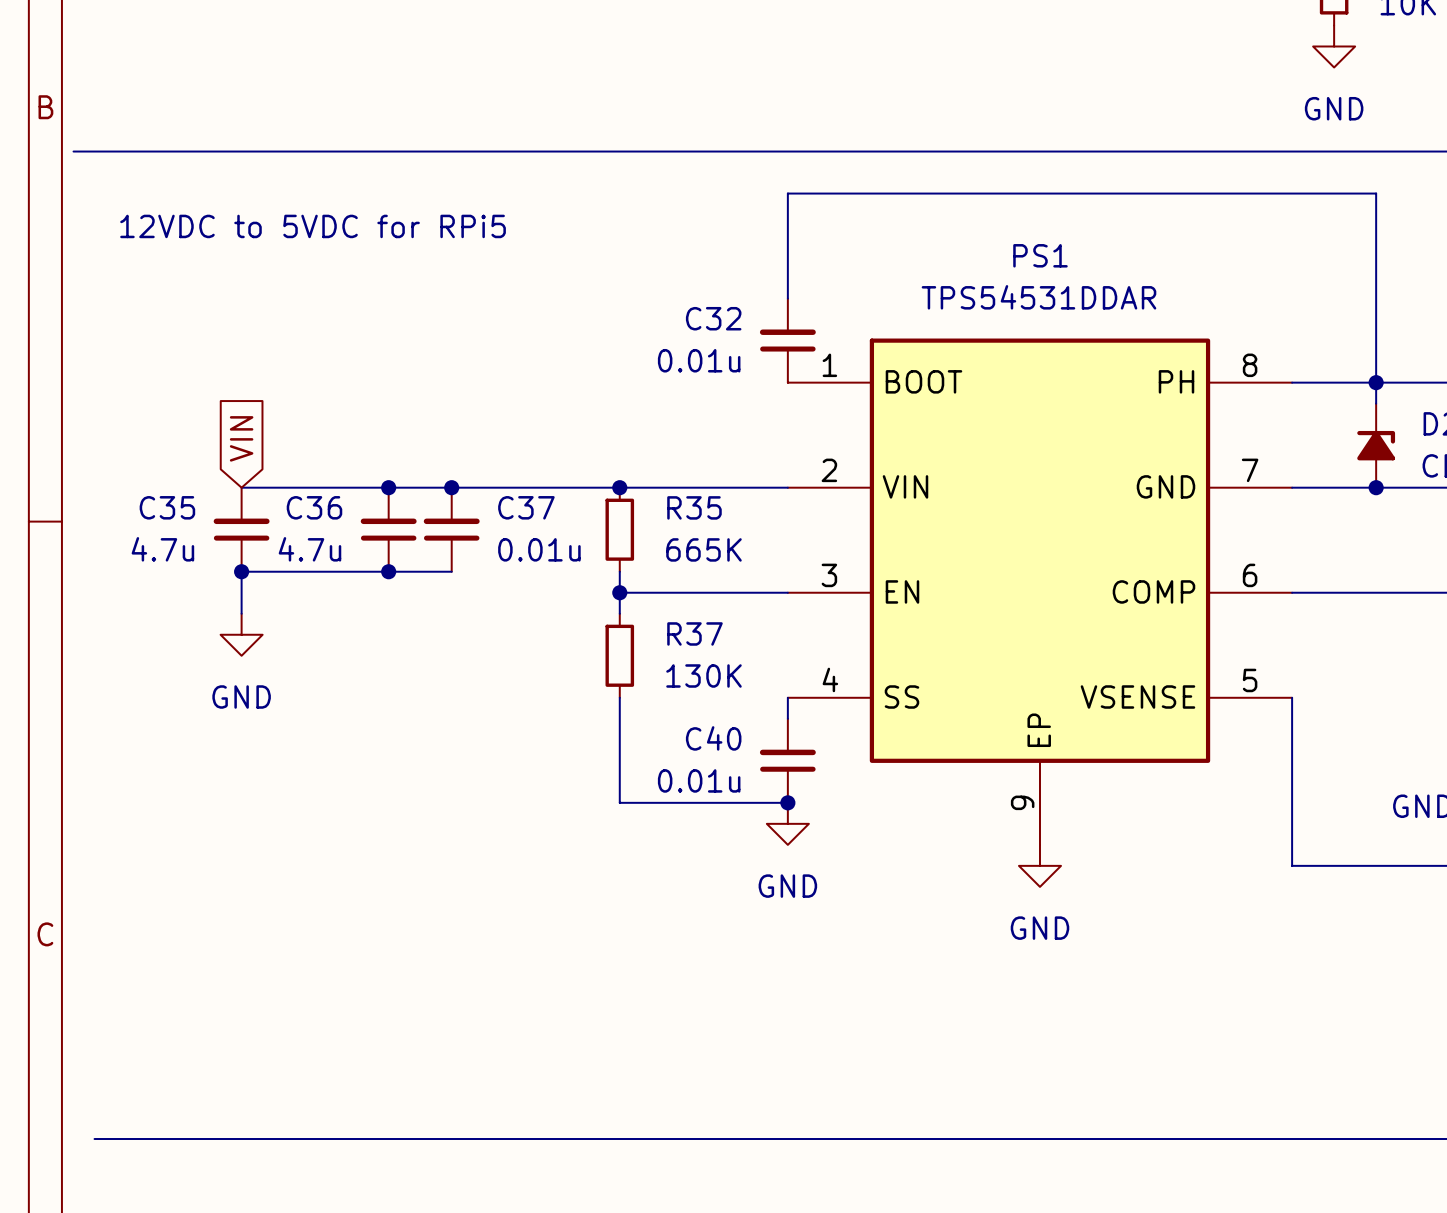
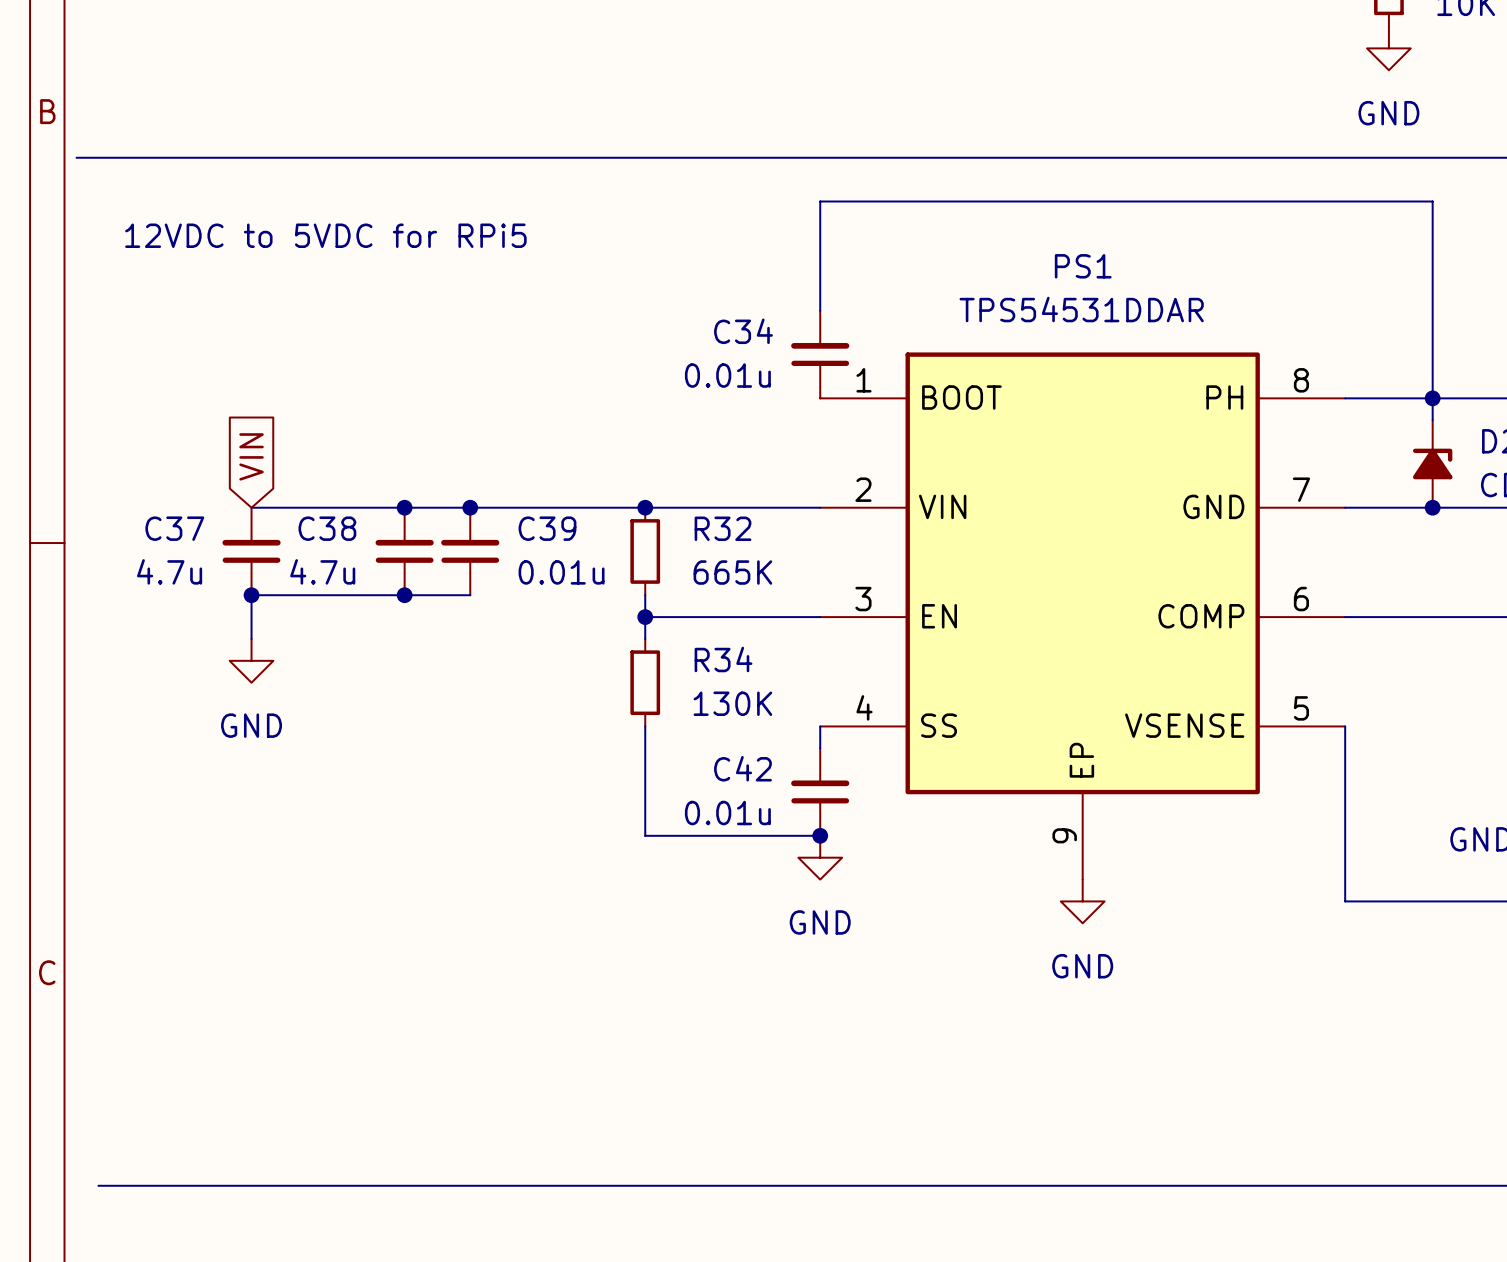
C32 name: C32 (713, 318) -> C34 (743, 331)
C35 name: C35 (167, 507) -> C37 (174, 528)
C36 name: C36 (314, 507) -> C38 (327, 528)
C37 name: C37 (526, 507) -> C39 (547, 528)
R35 name: R35 (694, 507) -> R32 (723, 528)
R37 name: R37 (694, 633) -> R34 (723, 659)
C40 name: C40 (713, 738) -> C42 (742, 768)

